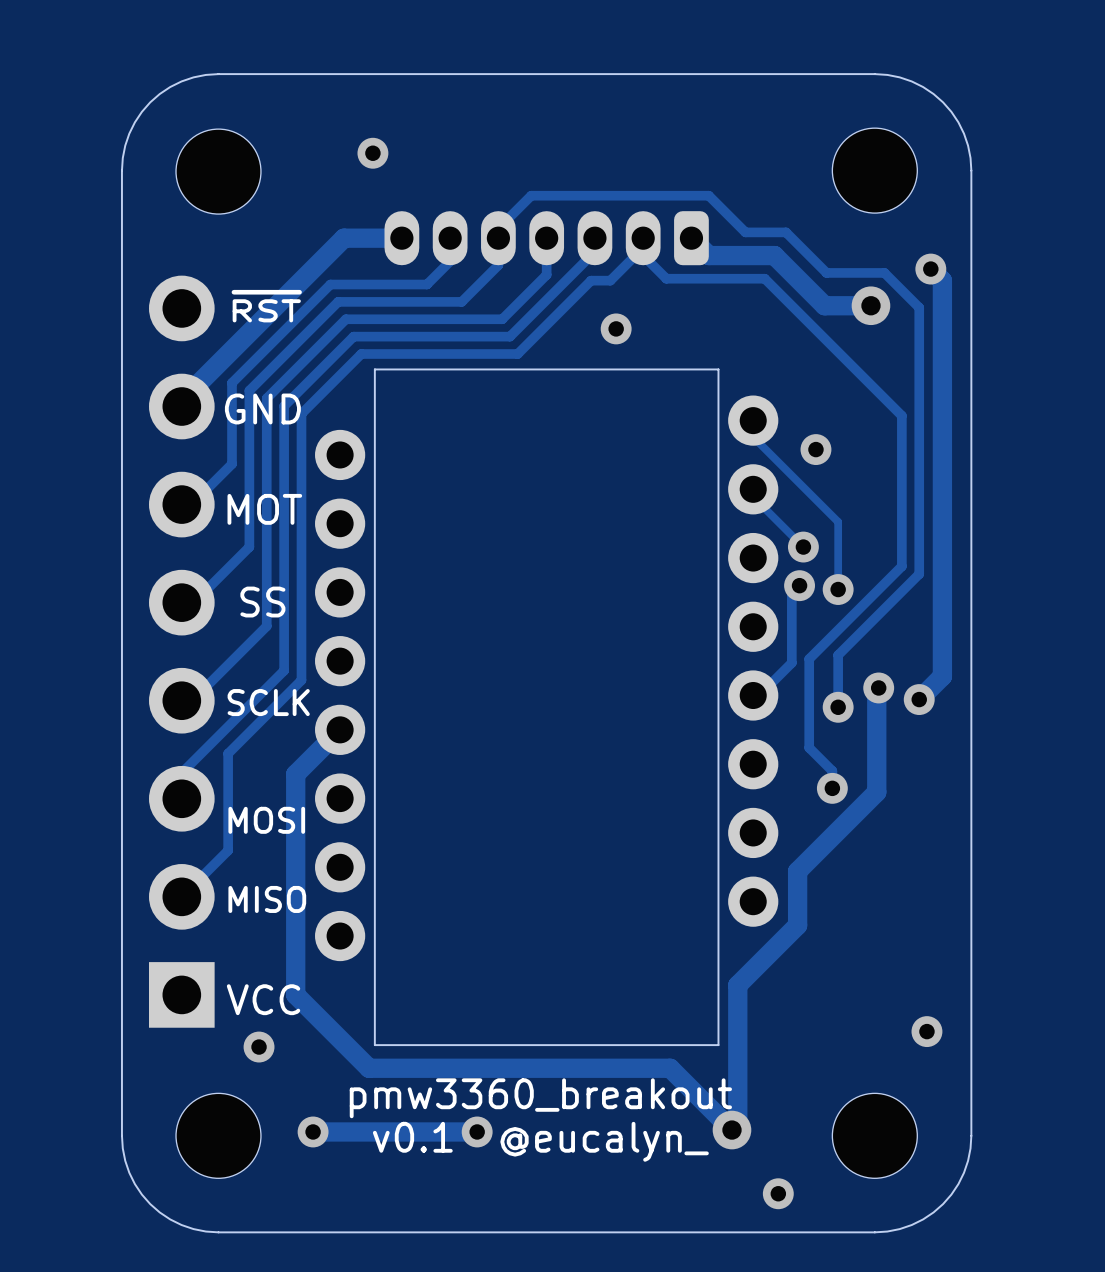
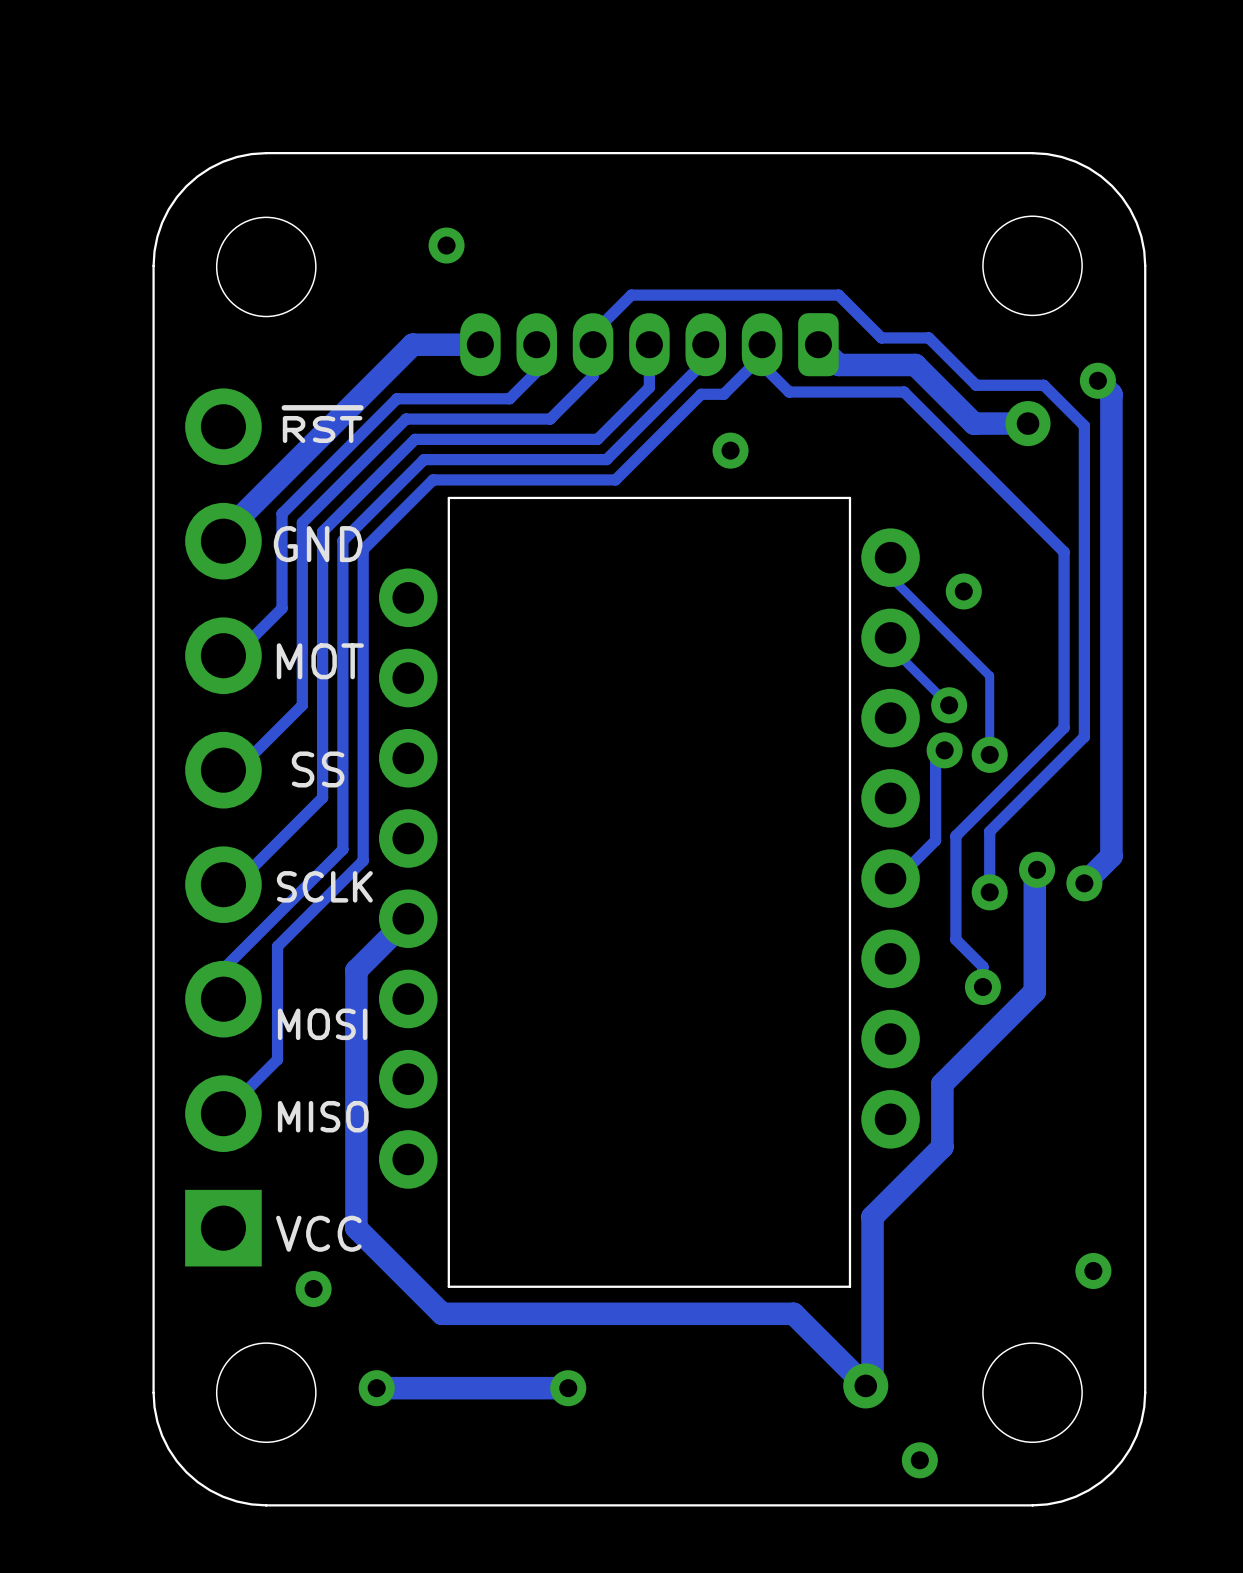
text: pmw3360_breakout (540, 1098) -> none
text: v0.1 @eucalyn_ (540, 1141) -> none

